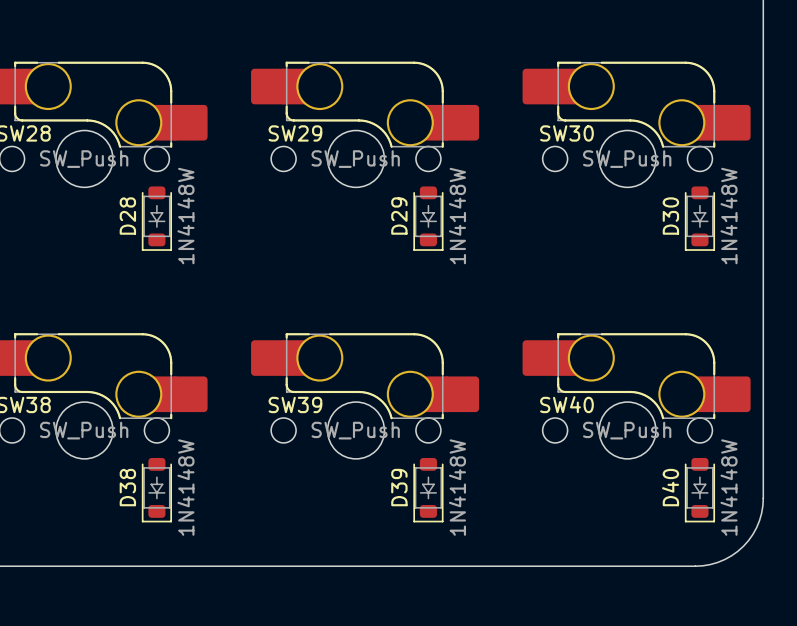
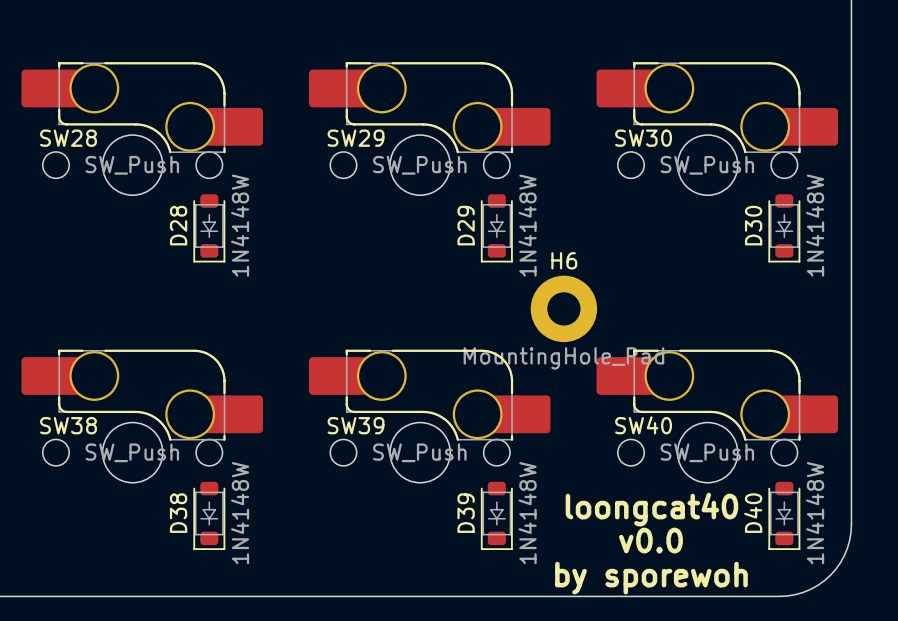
H6: none -> MountingHole_Pad (563, 308)
text: none -> loongcat40 (651, 509)
text: none -> v0.0 (650, 540)
text: none -> by sporewoh (651, 578)

